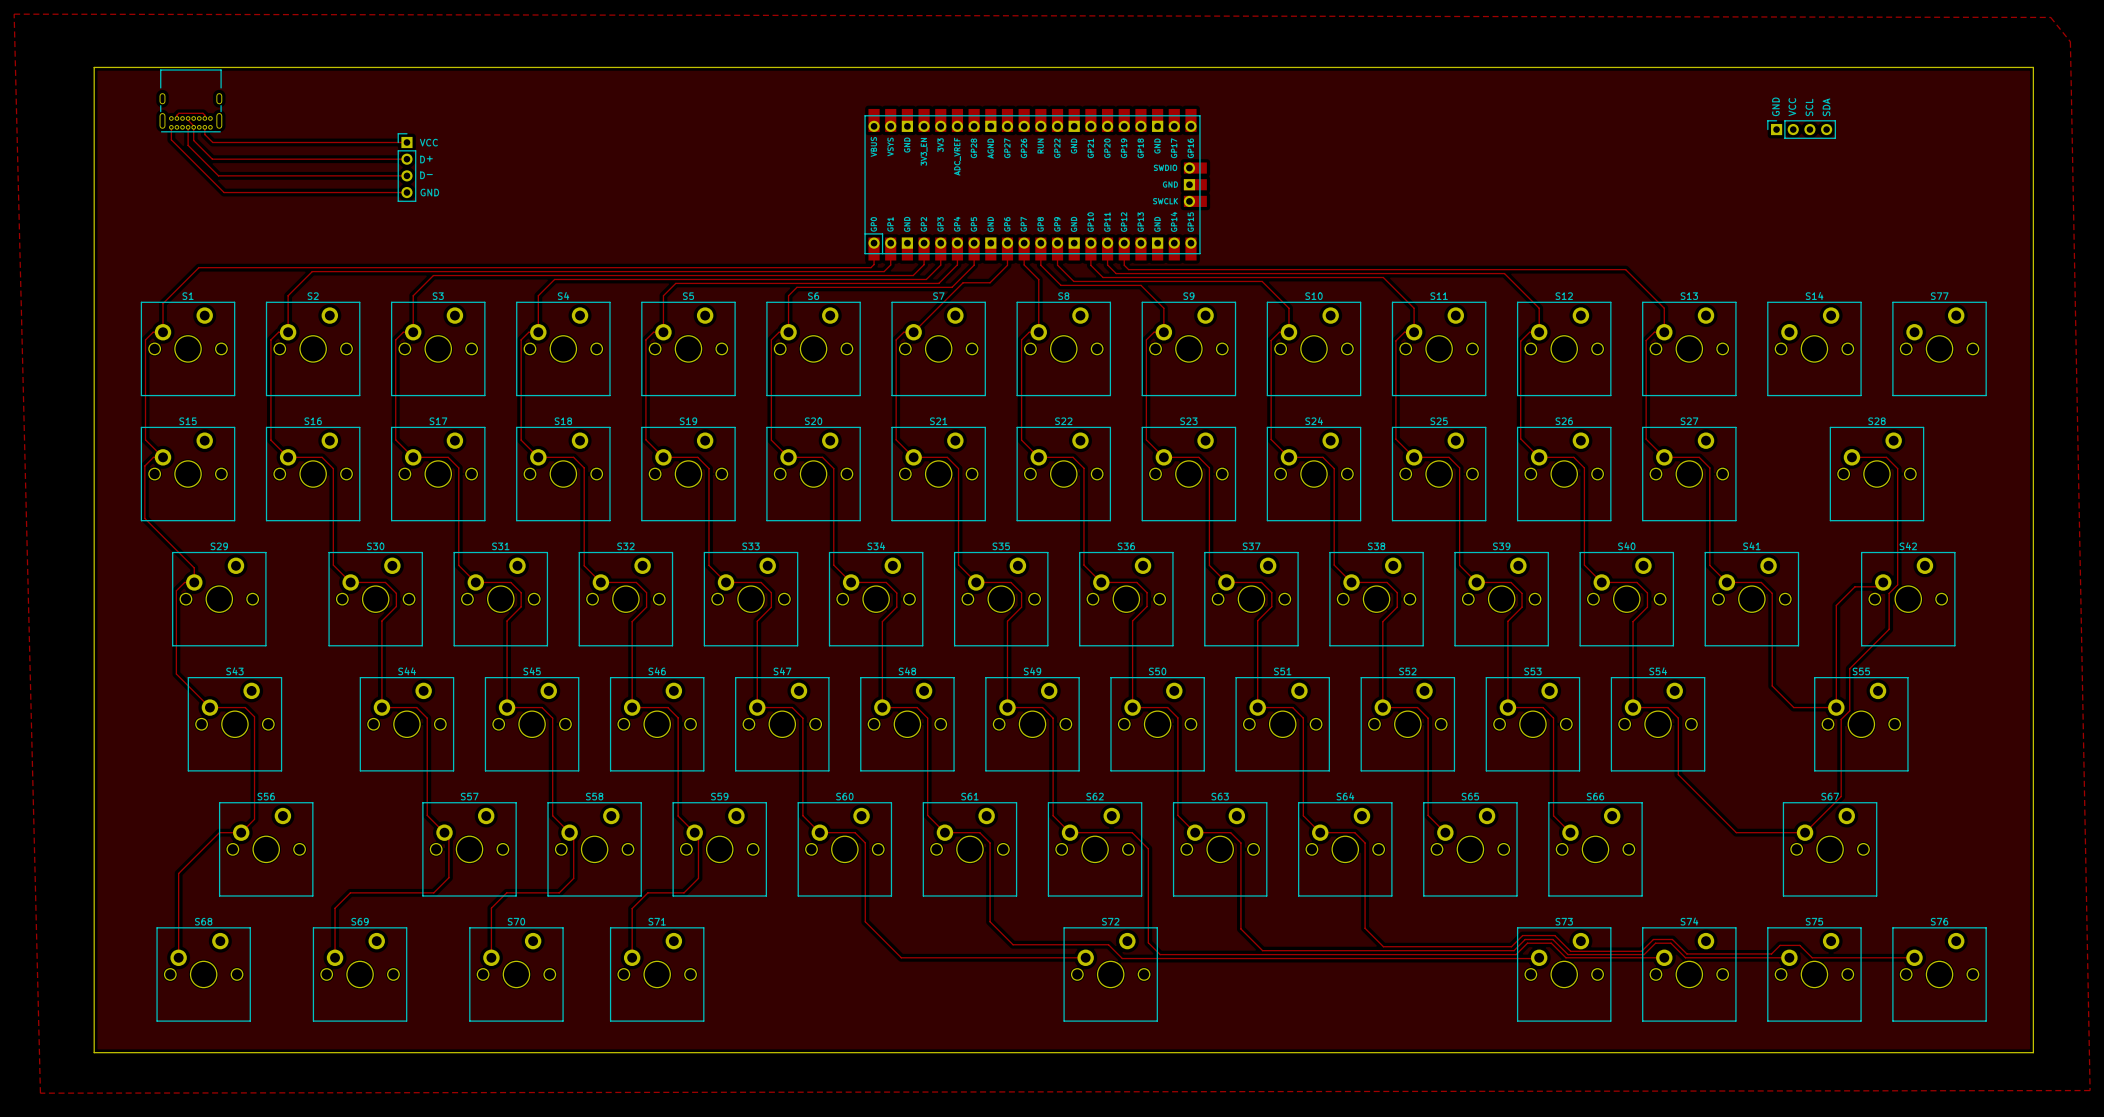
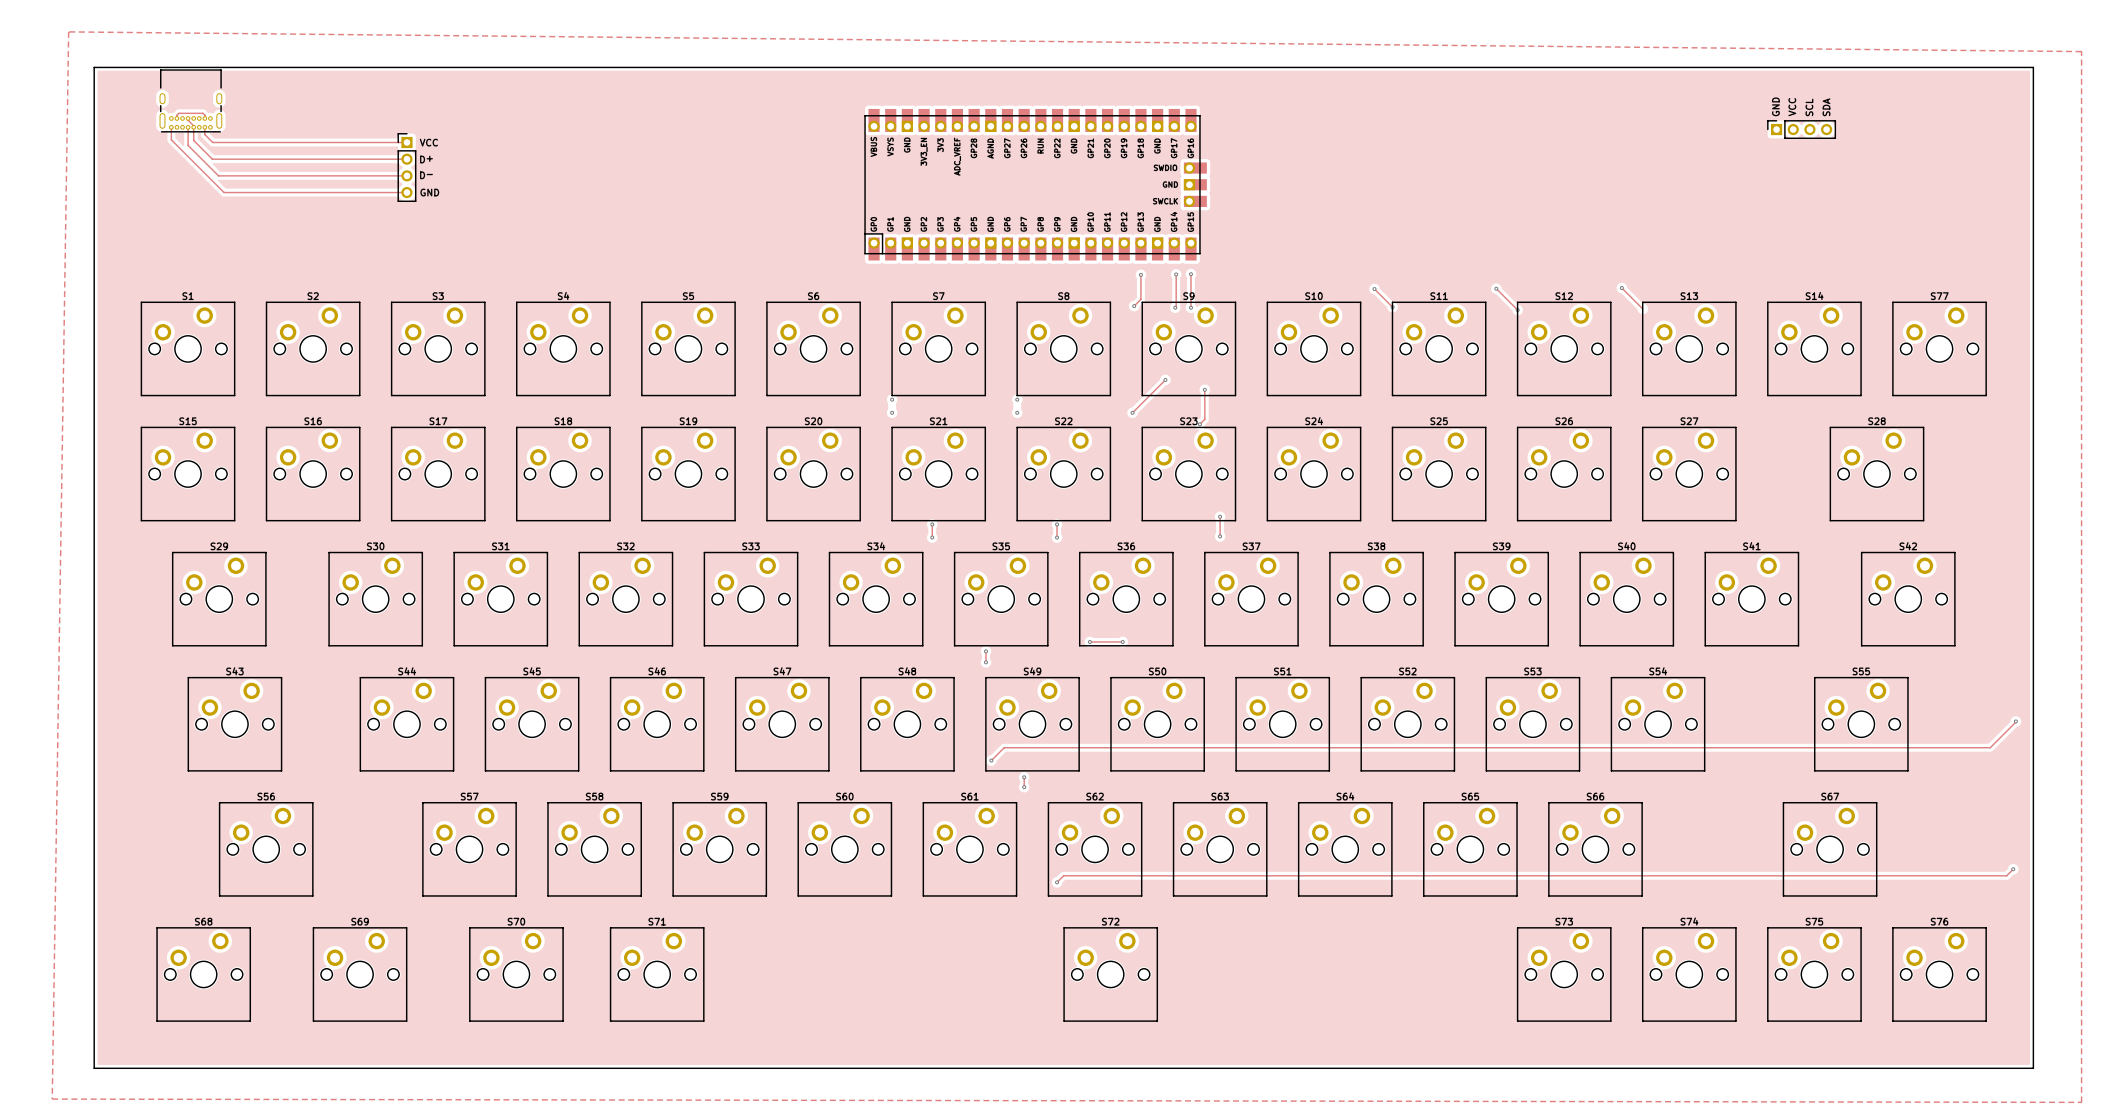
zone outline: (14, 14) (40, 1093) (2090, 1090) (2070, 41) (2050, 17) (14, 14) -> (68, 31) (52, 1099) (2081, 1102) (2081, 51) (68, 31)
track: (874, 243) (874, 264) (870, 267) (198, 267) (163, 303) (163, 332) (153, 332) (145, 339) (145, 439) (163, 457) (153, 457) (144, 465) (144, 518) (194, 567) (194, 582) (184, 582) (176, 590) (176, 674) (209, 707) (245, 707) (254, 716) (254, 819) (241, 832) (219, 832) (178, 873) (178, 957) -> none
track: (890, 243) (890, 265) (884, 271) (312, 271) (288, 295) (288, 332) (278, 332) (270, 339) (270, 440) (288, 457) (322, 457) (333, 468) (333, 565) (350, 582) (385, 582) (396, 593) (396, 606) (381, 620) (381, 707) (416, 707) (427, 718) (427, 815) (448, 837) (448, 877) (433, 892) (350, 892) (335, 908) (335, 957) -> none
track: (924, 243) (924, 264) (913, 275) (433, 275) (413, 295) (413, 332) (403, 332) (395, 339) (395, 439) (413, 457) (448, 457) (458, 467) (458, 565) (475, 582) (510, 582) (521, 592) (521, 606) (507, 620) (507, 707) (542, 707) (552, 718) (552, 815) (573, 836) (573, 878) (559, 892) (506, 892) (491, 908) (491, 957) -> none
track: (940, 243) (940, 265) (926, 279) (554, 279) (538, 295) (538, 332) (528, 332) (521, 339) (521, 440) (538, 457) (573, 457) (584, 467) (584, 565) (600, 582) (636, 582) (646, 592) (646, 607) (632, 621) (632, 707) (667, 707) (678, 717) (678, 816) (698, 836) (698, 878) (684, 892) (647, 892) (632, 908) (632, 957) -> none
track: (957, 243) (957, 264) (938, 283) (675, 283) (663, 295) (663, 332) (653, 332) (645, 339) (645, 439) (663, 457) (697, 457) (708, 468) (708, 565) (725, 582) (761, 582) (771, 592) (771, 607) (757, 621) (757, 707) (792, 707) (802, 718) (802, 815) (819, 832) (855, 832) (865, 842) (865, 921) (901, 957) (1085, 957) -> none
track: (974, 243) (974, 265) (951, 287) (796, 287) (788, 295) (788, 332) (779, 332) (771, 339) (771, 440) (788, 457) (822, 457) (833, 468) (833, 565) (851, 582) (886, 582) (896, 593) (896, 607) (882, 621) (882, 707) (917, 707) (927, 718) (927, 815) (944, 832) (979, 832) (990, 842) (990, 921) (1013, 944) (1108, 944) (1122, 958) (1539, 957) -> none
track: (1007, 243) (1007, 265) (990, 282) (963, 282) (913, 332) (903, 332) (896, 339) (896, 439) (913, 457) (947, 457) (958, 468) (958, 564) (976, 582) (1010, 582) (1021, 593) (1021, 607) (1007, 621) (1007, 707) (1042, 707) (1053, 718) (1053, 815) (1070, 832) (1132, 832) (1148, 848) (1148, 942) (1160, 954) (1516, 954) (1527, 943) (1551, 943) (1565, 957) (1664, 957) -> none
track: (1024, 243) (1024, 264) (1038, 279) (1038, 332) (1029, 332) (1021, 339) (1021, 440) (1038, 457) (1073, 457) (1083, 468) (1083, 565) (1101, 582) (1136, 582) (1147, 592) (1147, 606) (1132, 620) (1132, 707) (1167, 707) (1177, 717) (1177, 815) (1195, 832) (1230, 832) (1240, 842) (1240, 928) (1262, 950) (1514, 950) (1525, 939) (1552, 939) (1567, 954) (1644, 954) (1655, 943) (1670, 943) (1685, 957) (1789, 957) -> none
track: (1040, 243) (1040, 265) (1060, 285) (1140, 285) (1163, 308) (1163, 332) (1154, 332) (1146, 339) (1146, 439) (1163, 457) (1198, 457) (1209, 467) (1209, 565) (1226, 582) (1261, 582) (1271, 592) (1271, 606) (1257, 620) (1257, 707) (1292, 707) (1303, 718) (1303, 815) (1320, 832) (1354, 832) (1365, 842) (1365, 928) (1383, 946) (1511, 946) (1522, 935) (1554, 935) (1570, 951) (1641, 951) (1653, 939) (1672, 939) (1686, 953) (1771, 953) (1780, 945) (1799, 945) (1812, 957) (1914, 957) -> none
track: (1057, 243) (1057, 265) (1073, 281) (1262, 281) (1288, 308) (1288, 332) (1279, 332) (1271, 340) (1271, 439) (1288, 457) (1322, 457) (1334, 468) (1334, 565) (1351, 582) (1386, 582) (1397, 592) (1397, 607) (1382, 621) (1382, 707) (1417, 707) (1428, 718) (1428, 815) (1445, 832) -> none
track: (1090, 243) (1090, 265) (1103, 277) (1383, 277) (1414, 308) (1414, 332) (1404, 332) (1395, 340) (1395, 439) (1414, 457) (1449, 457) (1459, 467) (1459, 565) (1476, 582) (1511, 582) (1522, 593) (1522, 607) (1507, 621) (1507, 707) (1542, 707) (1553, 718) (1553, 815) (1570, 832) -> none
track: (1107, 243) (1107, 264) (1116, 273) (1504, 273) (1539, 308) (1539, 332) (1529, 332) (1520, 341) (1520, 438) (1539, 457) (1573, 457) (1584, 467) (1584, 565) (1601, 582) (1636, 582) (1647, 593) (1647, 607) (1633, 621) (1633, 707) (1667, 707) (1678, 718) (1678, 774) (1736, 832) (1805, 832) (1841, 796) (1841, 719) (1849, 710) (1849, 668) (1889, 629) (1889, 593) (1897, 584) (1897, 468) (1886, 457) (1851, 457) -> none
track: (1124, 243) (1124, 265) (1128, 269) (1625, 269) (1664, 308) (1664, 332) (1654, 332) (1646, 340) (1646, 439) (1664, 457) (1699, 457) (1709, 467) (1709, 565) (1726, 582) (1761, 582) (1772, 593) (1772, 686) (1793, 707) (1836, 707) (1836, 605) (1854, 586) (1878, 586) (1883, 582) -> none
track: none -> (1140, 274) (1140, 299) (1134, 306)
via: none -> (1140, 274)
track: none -> (1176, 274) (1175, 307)
via: none -> (1176, 274)
track: none -> (1190, 274) (1190, 307)
via: none -> (1190, 274)
track: none -> (1496, 288) (1517, 310)
via: none -> (1496, 288)
track: none -> (1621, 288) (1642, 308)
via: none -> (1621, 288)
track: none -> (1374, 289) (1392, 307)
via: none -> (1374, 289)
via: none -> (1134, 306)
via: none -> (1175, 307)
via: none -> (1190, 307)
via: none -> (1392, 307)
via: none -> (1517, 310)
track: none -> (1165, 379) (1132, 412)
via: none -> (1165, 379)
track: none -> (1204, 389) (1204, 419) (1199, 424)
via: none -> (1204, 389)
via: none -> (892, 399)
via: none -> (1017, 399)
via: none -> (892, 412)
via: none -> (1017, 412)
via: none -> (1132, 412)
via: none -> (1199, 424)
track: none -> (1220, 516) (1220, 536)
via: none -> (1220, 516)
track: none -> (932, 524) (932, 537)
via: none -> (932, 524)
track: none -> (1057, 524) (1057, 537)
via: none -> (1057, 524)
via: none -> (1220, 536)
via: none -> (932, 537)
via: none -> (1057, 537)
track: none -> (1089, 641) (1122, 641)
via: none -> (1089, 641)
via: none -> (1122, 641)
track: none -> (985, 651) (985, 662)
via: none -> (985, 651)
via: none -> (985, 662)
track: none -> (2015, 721) (1990, 747) (1004, 747) (991, 760)
via: none -> (2015, 721)
via: none -> (991, 760)
track: none -> (1024, 777) (1024, 787)
via: none -> (1024, 777)
via: none -> (1024, 787)
track: none -> (2013, 869) (2006, 875) (1063, 875) (1057, 882)
via: none -> (2013, 869)
via: none -> (1057, 882)
board edge: (94, 1052) (2033, 1052) -> (94, 1052) (94, 1068) (2033, 1068) (2033, 1052)

